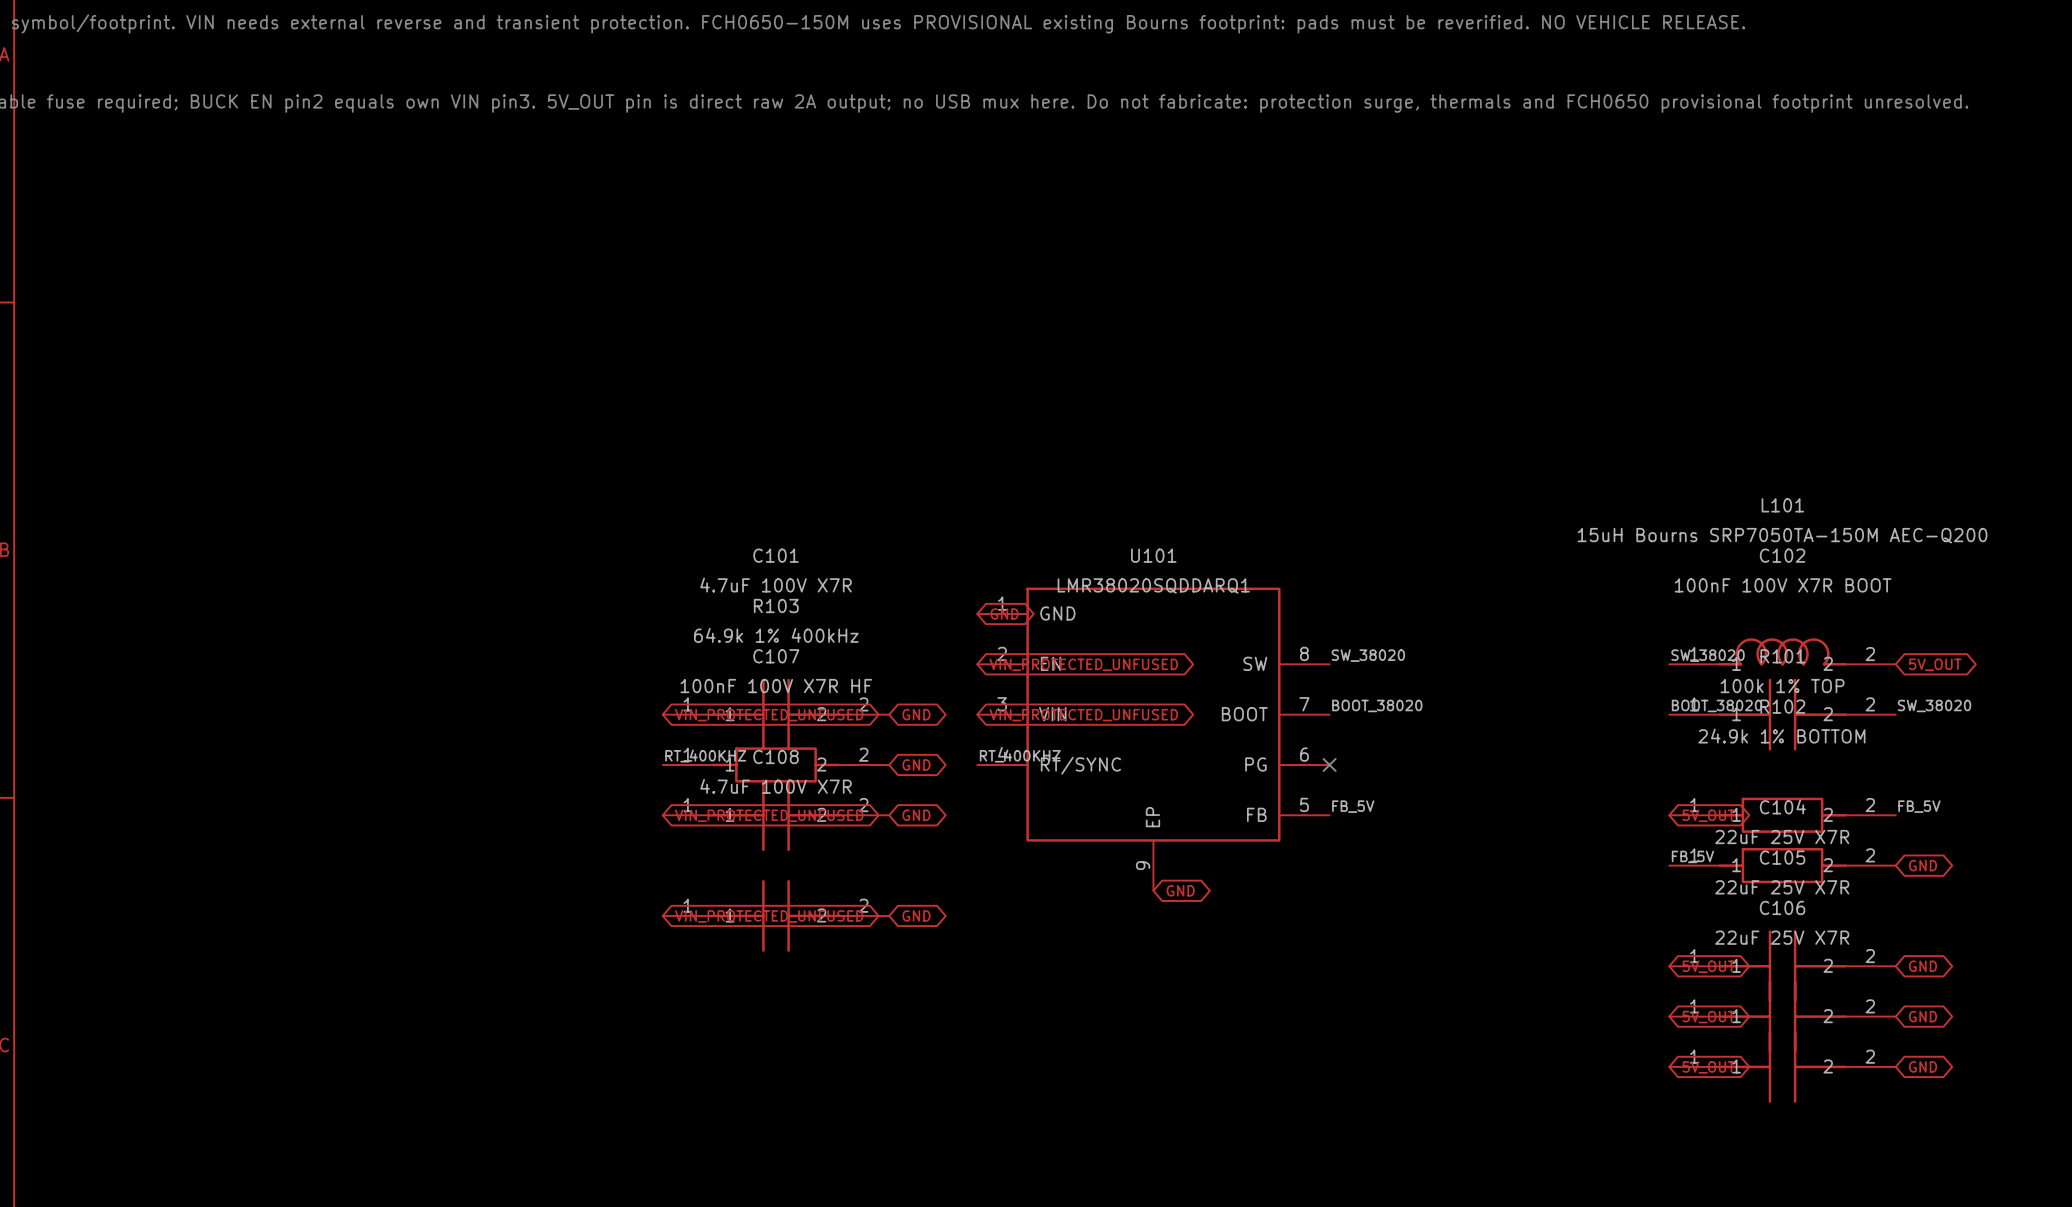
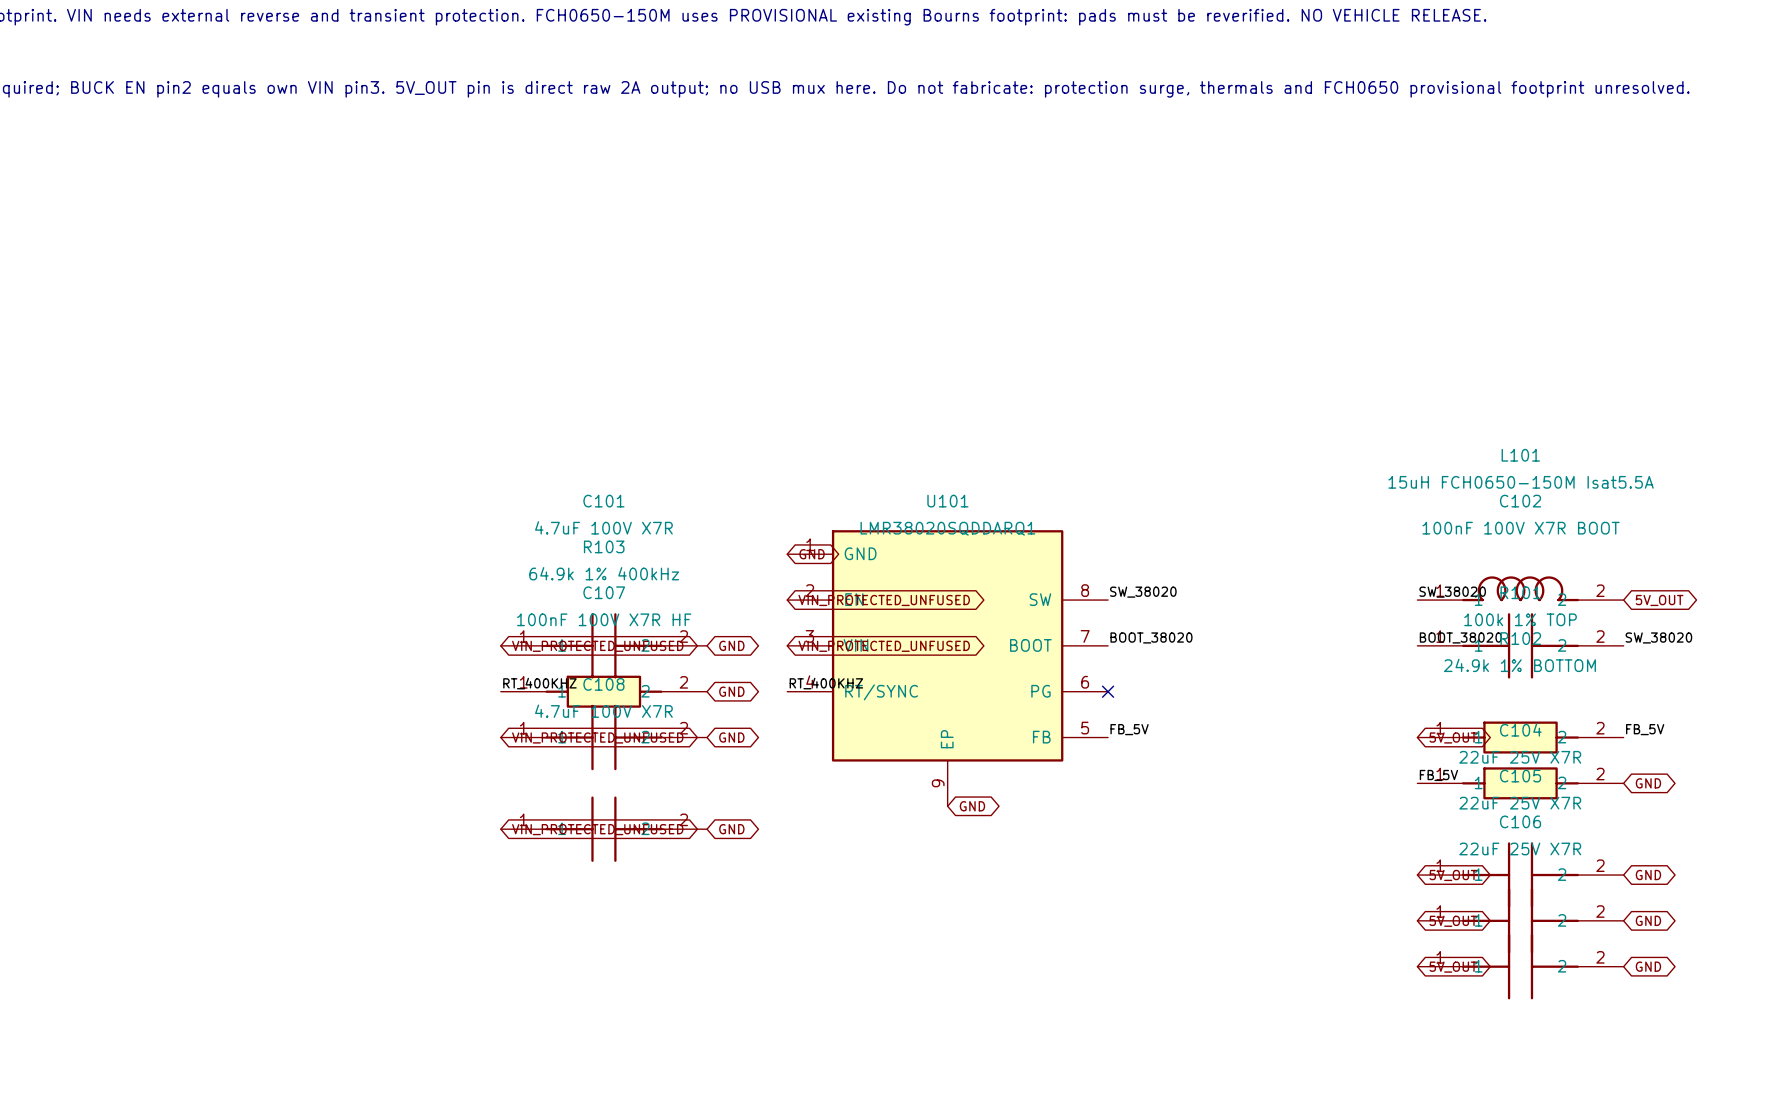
L101 value: 15uH Bourns SRP7050TA-150M AEC-Q200 (1782, 535) -> 15uH FCH0650-150M Isat5.5A (1521, 482)

